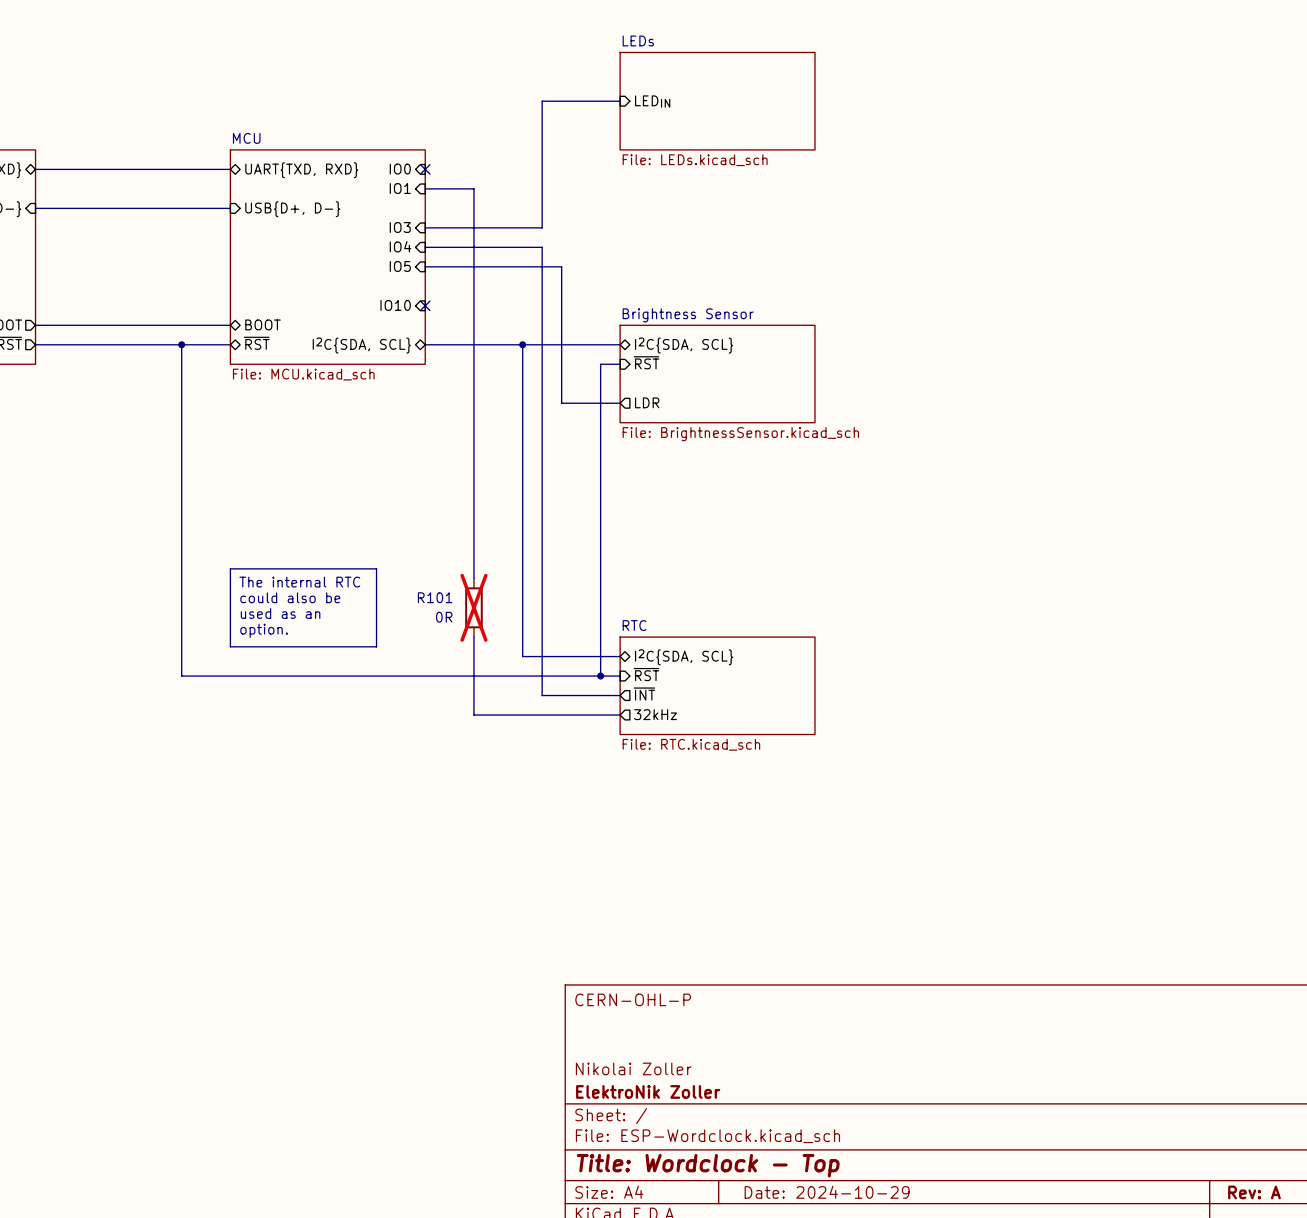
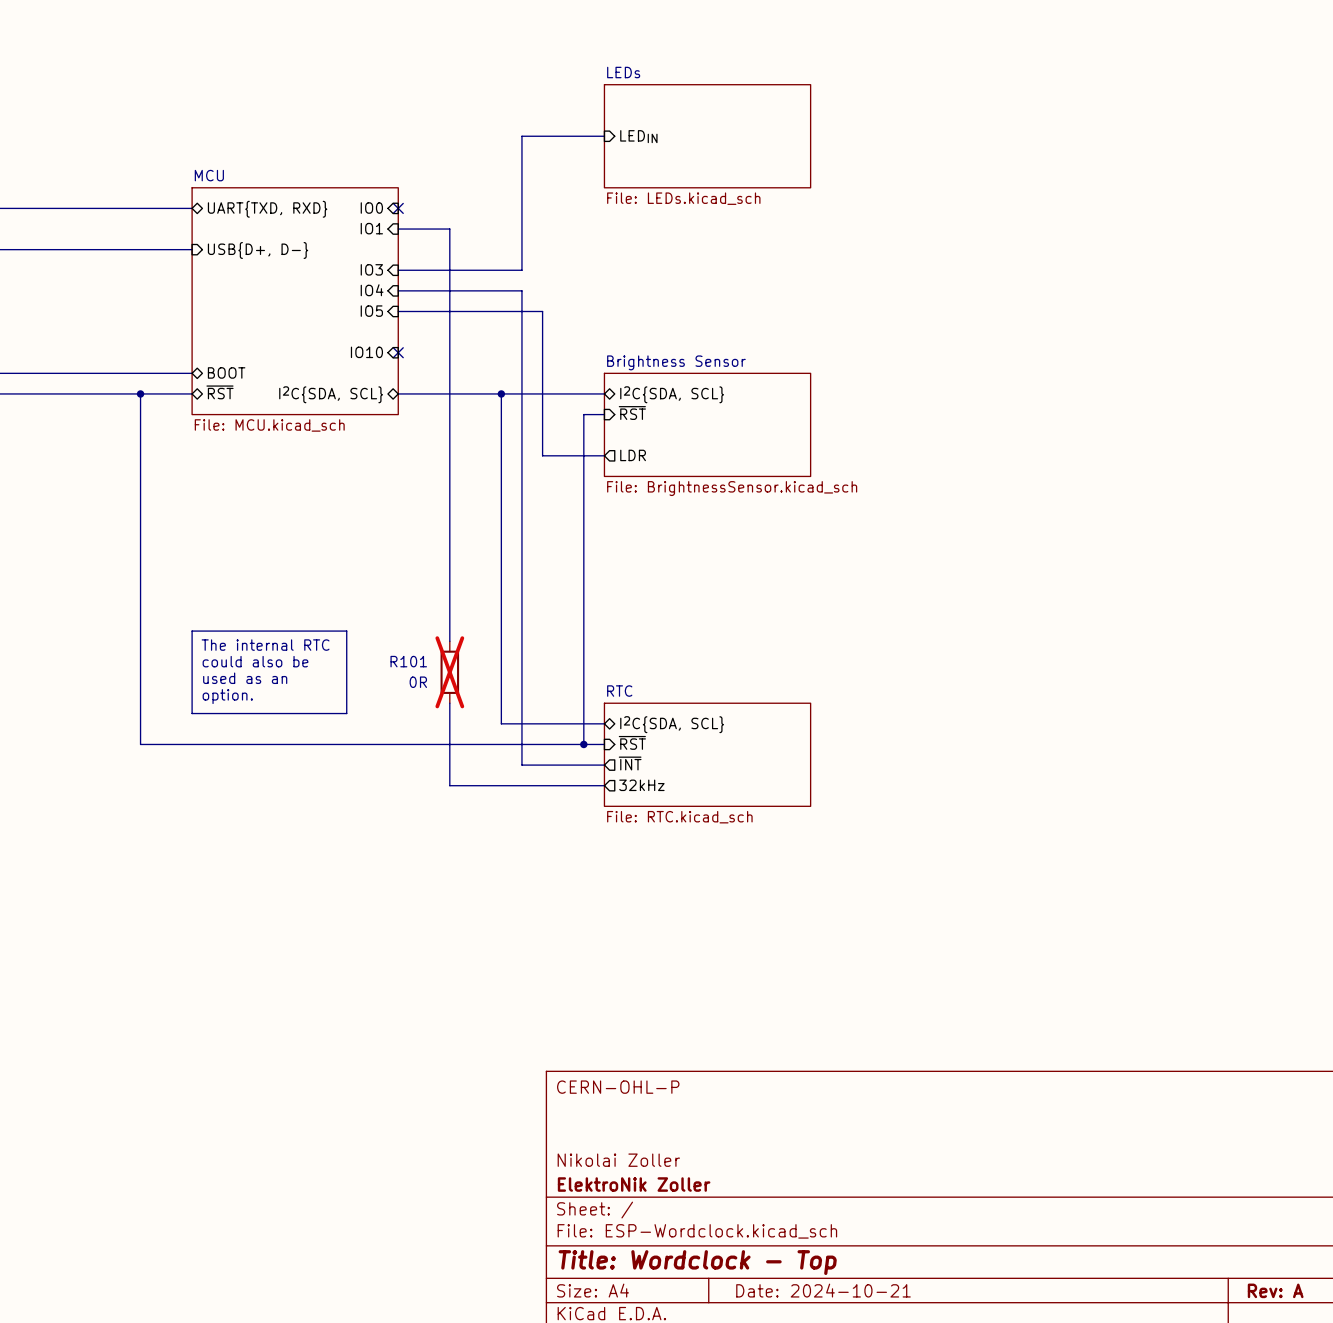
title block: Date: 2024-10-29 (827, 1192) -> Date: 2024-10-21 (823, 1290)

